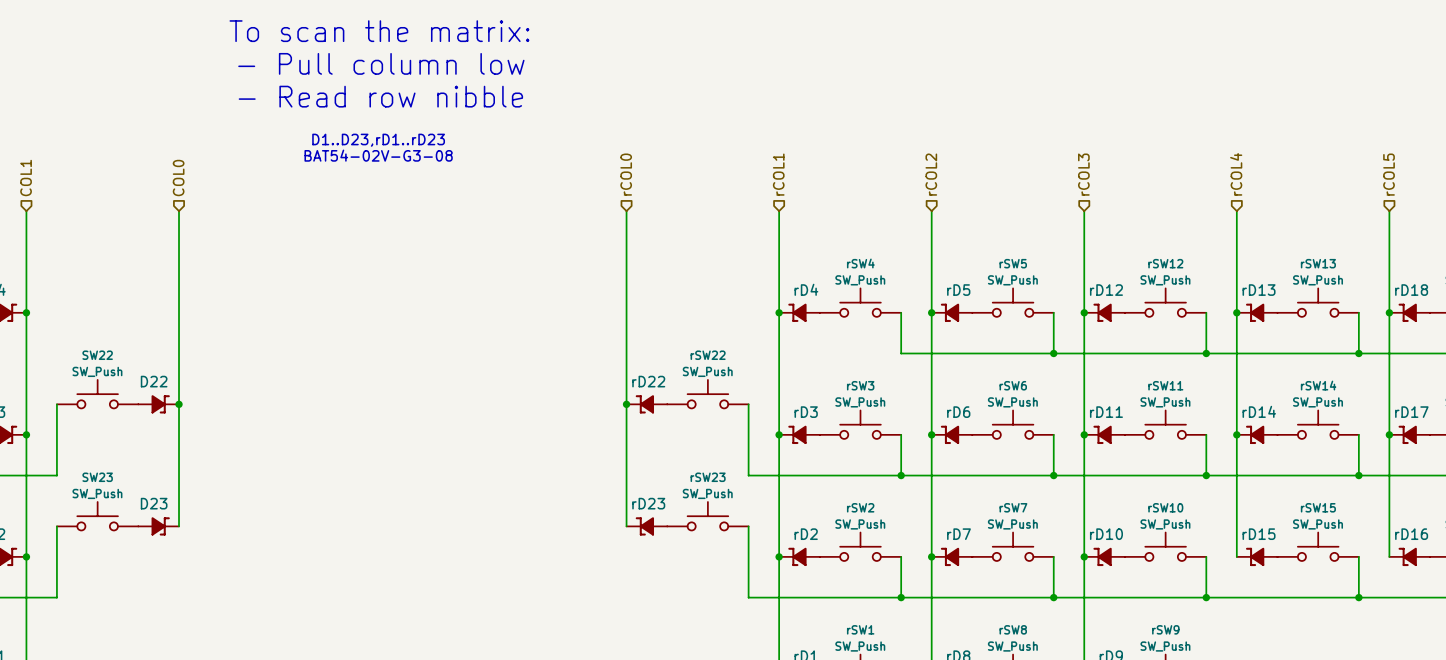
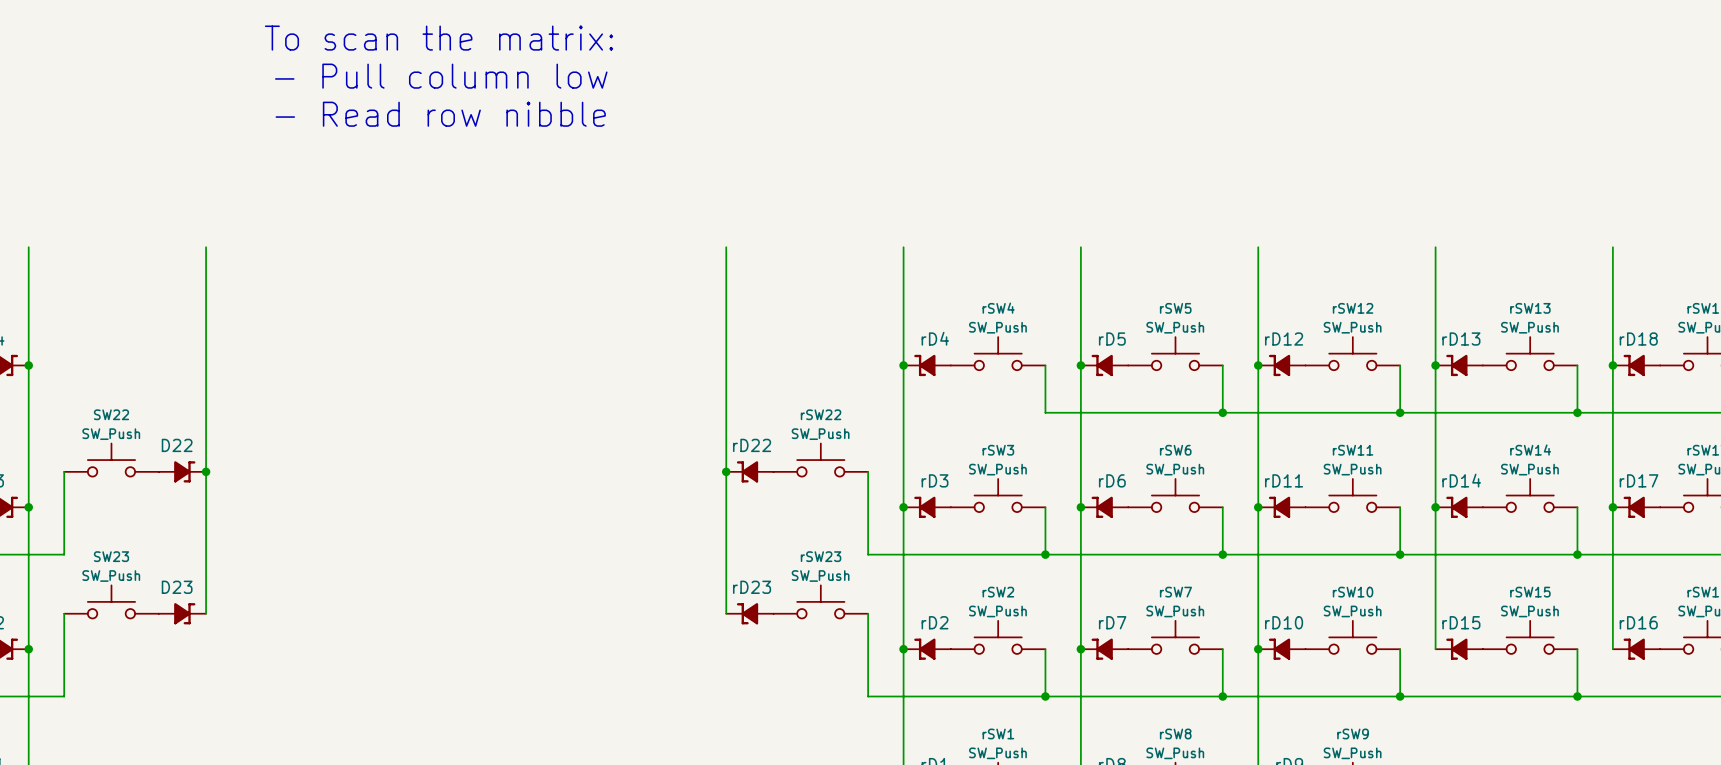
text: D1..D23,rD1..rD23 (378, 140) -> none
text: BAT54-02V-G3-08 (378, 155) -> none
hierarchical label: rCOL0 (626, 174) -> none
hierarchical label: rCOL1 (778, 174) -> none
hierarchical label: rCOL2 (931, 174) -> none
hierarchical label: rCOL3 (1083, 174) -> none
hierarchical label: rCOL4 (1236, 174) -> none
hierarchical label: rCOL5 (1389, 174) -> none
hierarchical label: COL1 (26, 177) -> none
hierarchical label: COL0 (178, 177) -> none

